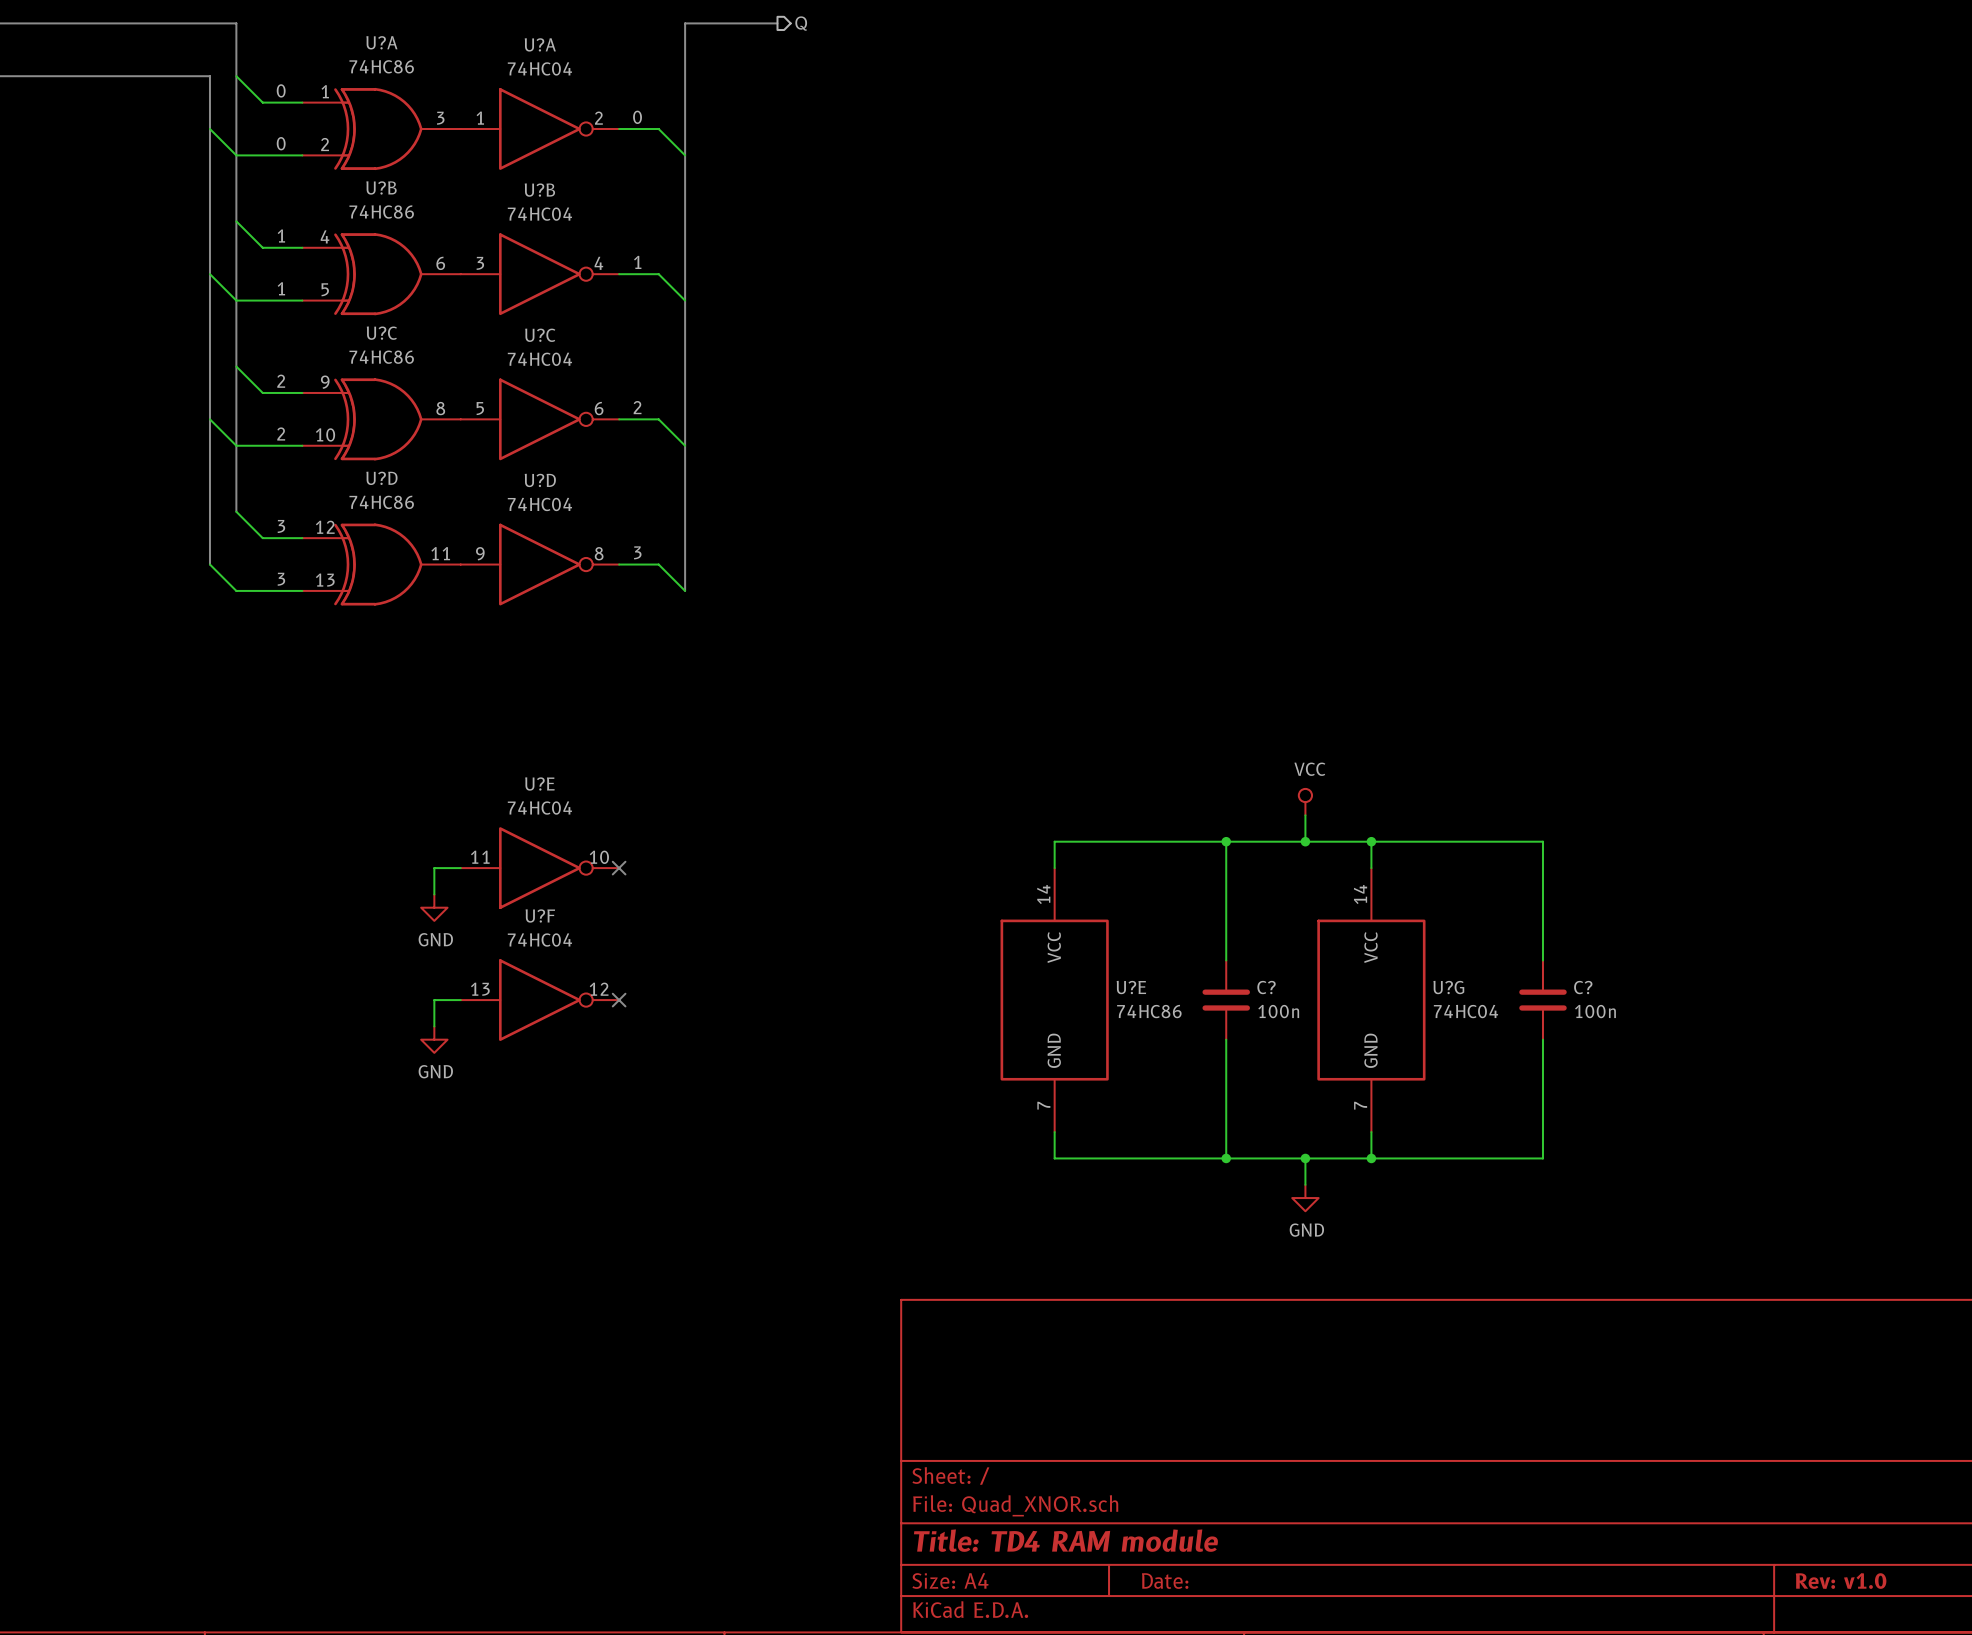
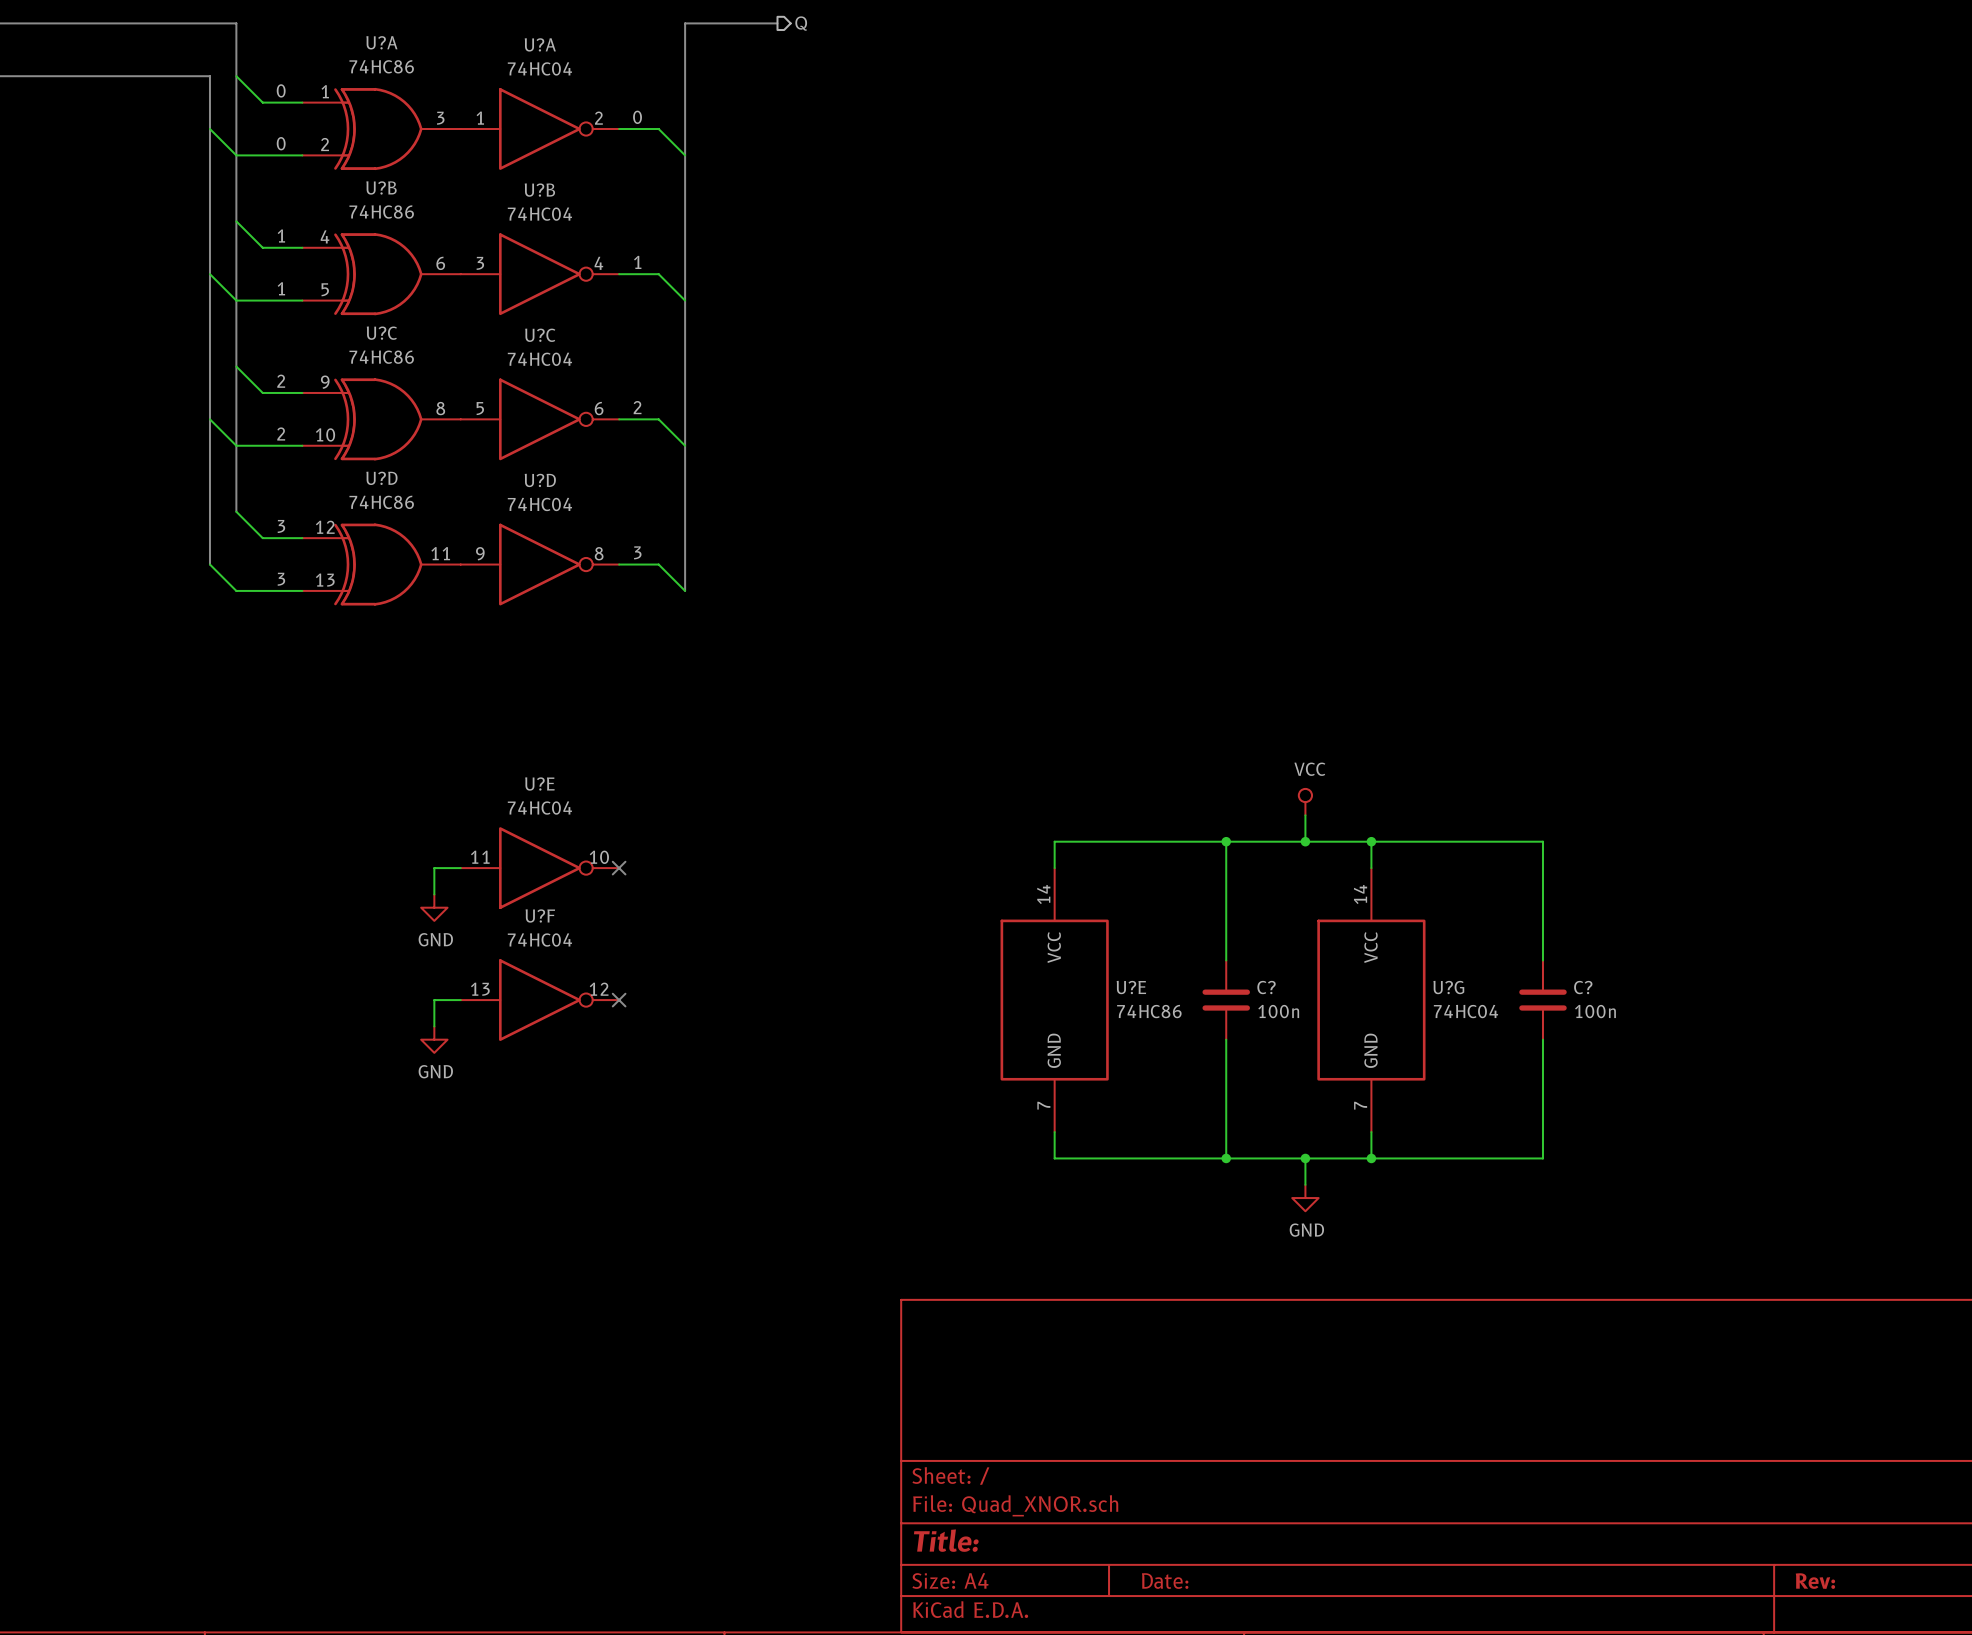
title block: Title: TD4 RAM module (1065, 1540) -> Title: (946, 1540)
title block: Rev: v1.0 (1841, 1581) -> Rev: (1815, 1581)

